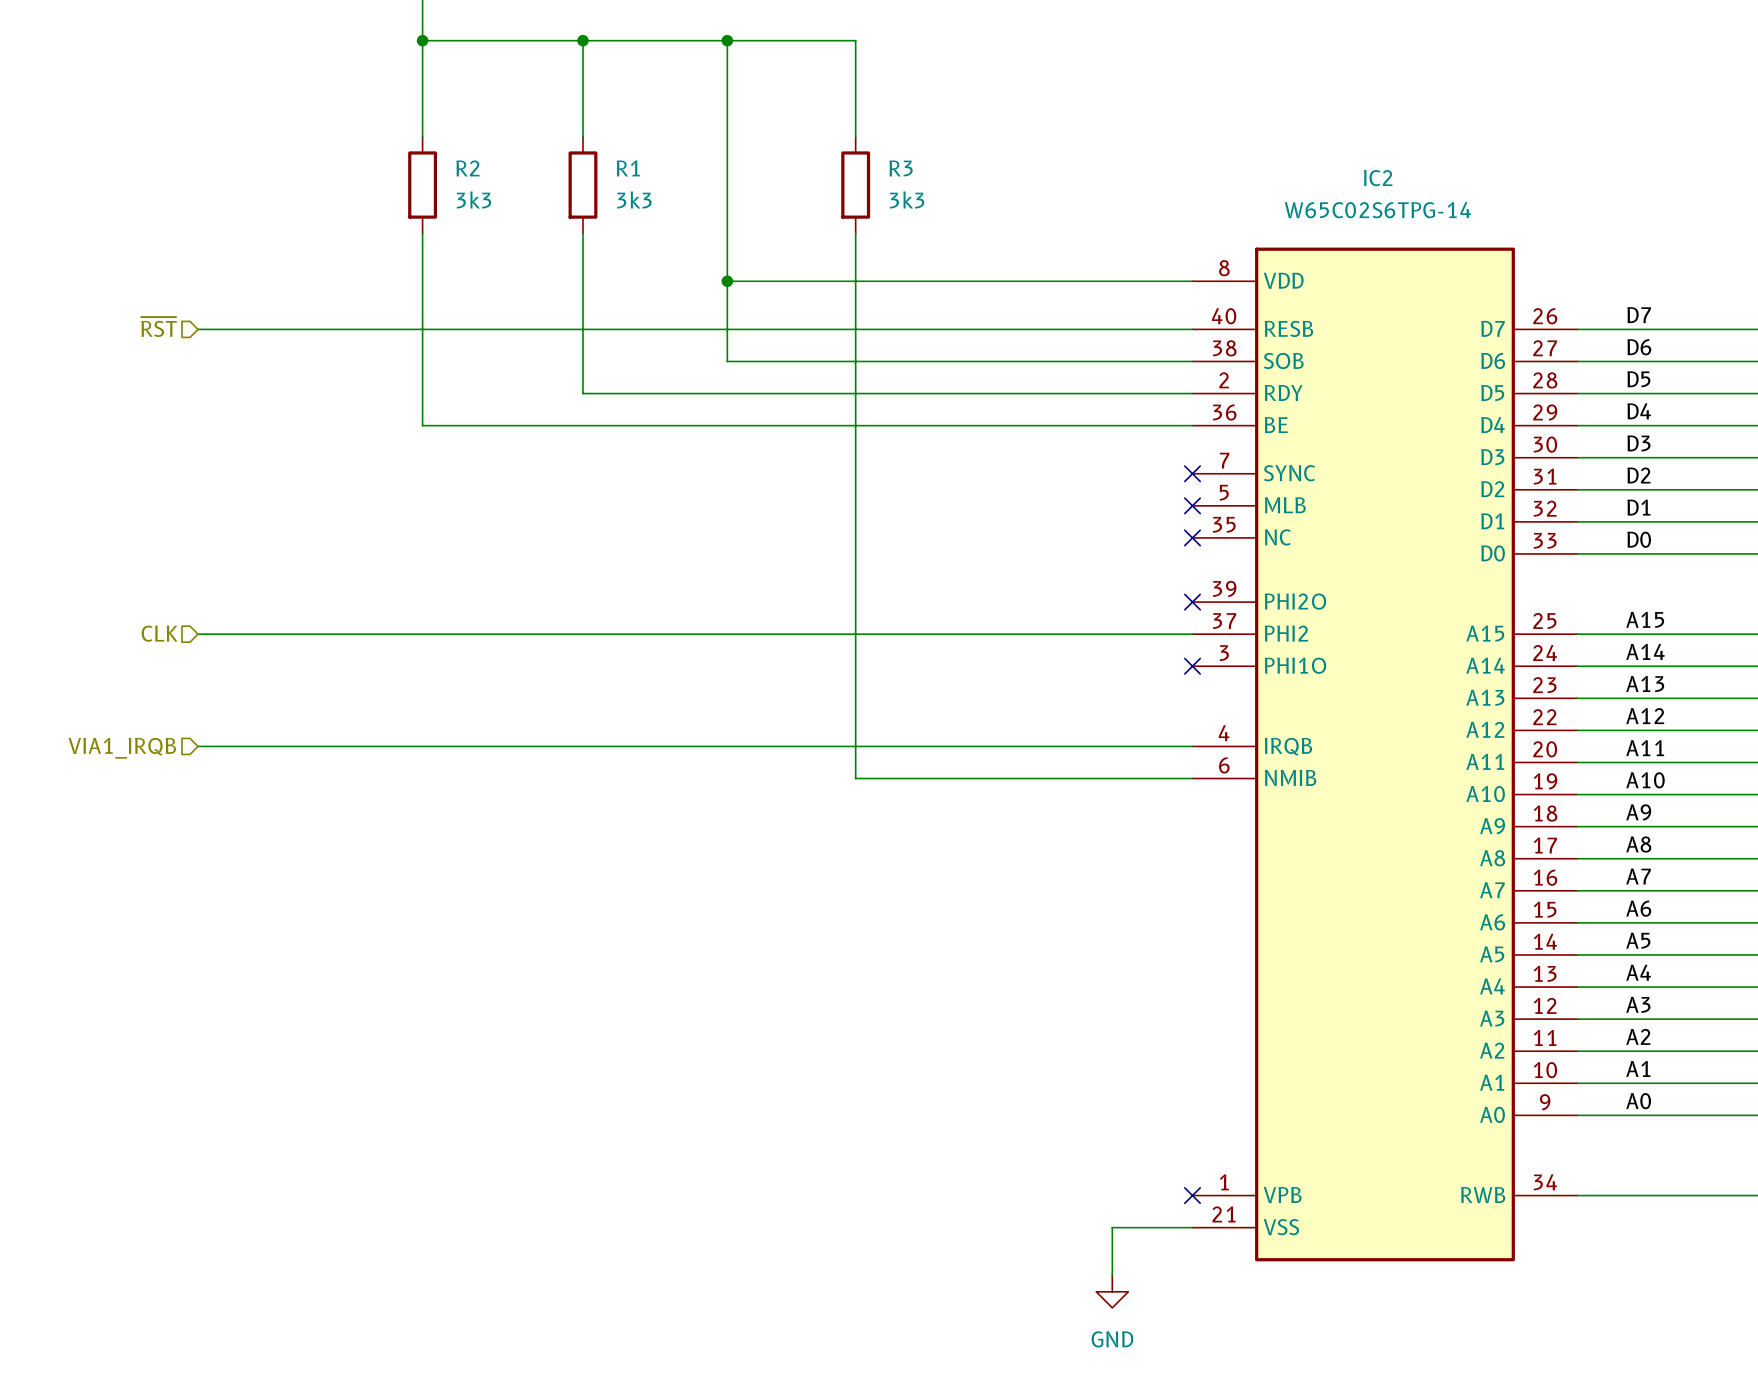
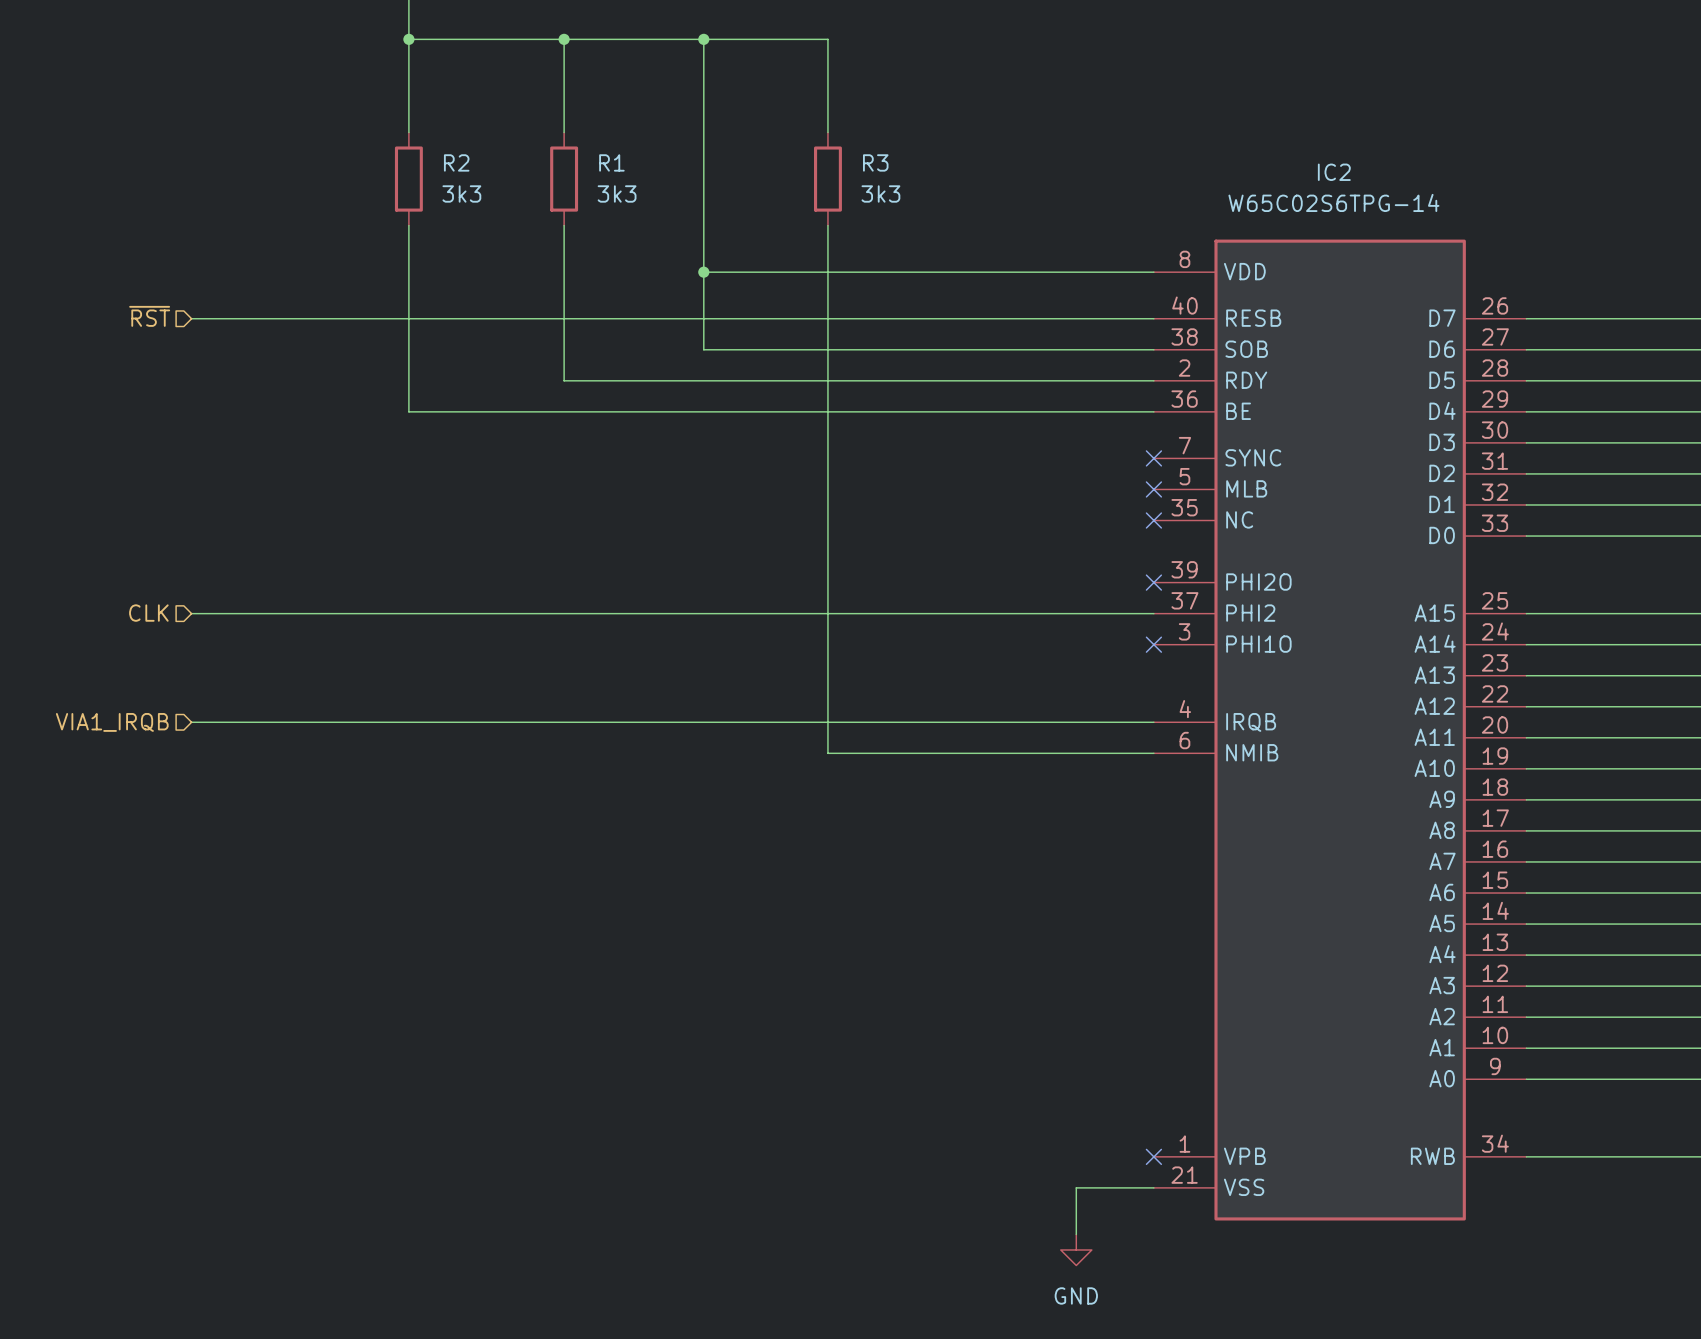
label: D7 (1639, 315) -> none
label: D6 (1639, 347) -> none
label: D5 (1638, 379) -> none
label: D4 (1639, 411) -> none
label: D3 (1638, 443) -> none
label: D2 (1638, 475) -> none
label: D1 (1638, 507) -> none
label: D0 (1639, 539) -> none
label: A15 (1645, 619) -> none
label: A14 (1645, 651) -> none
label: A13 (1645, 684) -> none
label: A12 (1645, 716) -> none
label: A11 (1645, 748) -> none
label: A10 (1645, 780) -> none
label: A9 (1638, 812) -> none
label: A8 (1638, 844) -> none
label: A7 (1638, 876) -> none
label: A6 (1638, 908) -> none
label: A5 (1638, 940) -> none
label: A4 (1638, 972) -> none
label: A3 (1638, 1004) -> none
label: A2 (1638, 1036) -> none
label: A1 (1638, 1068) -> none
label: A0 (1638, 1101) -> none

